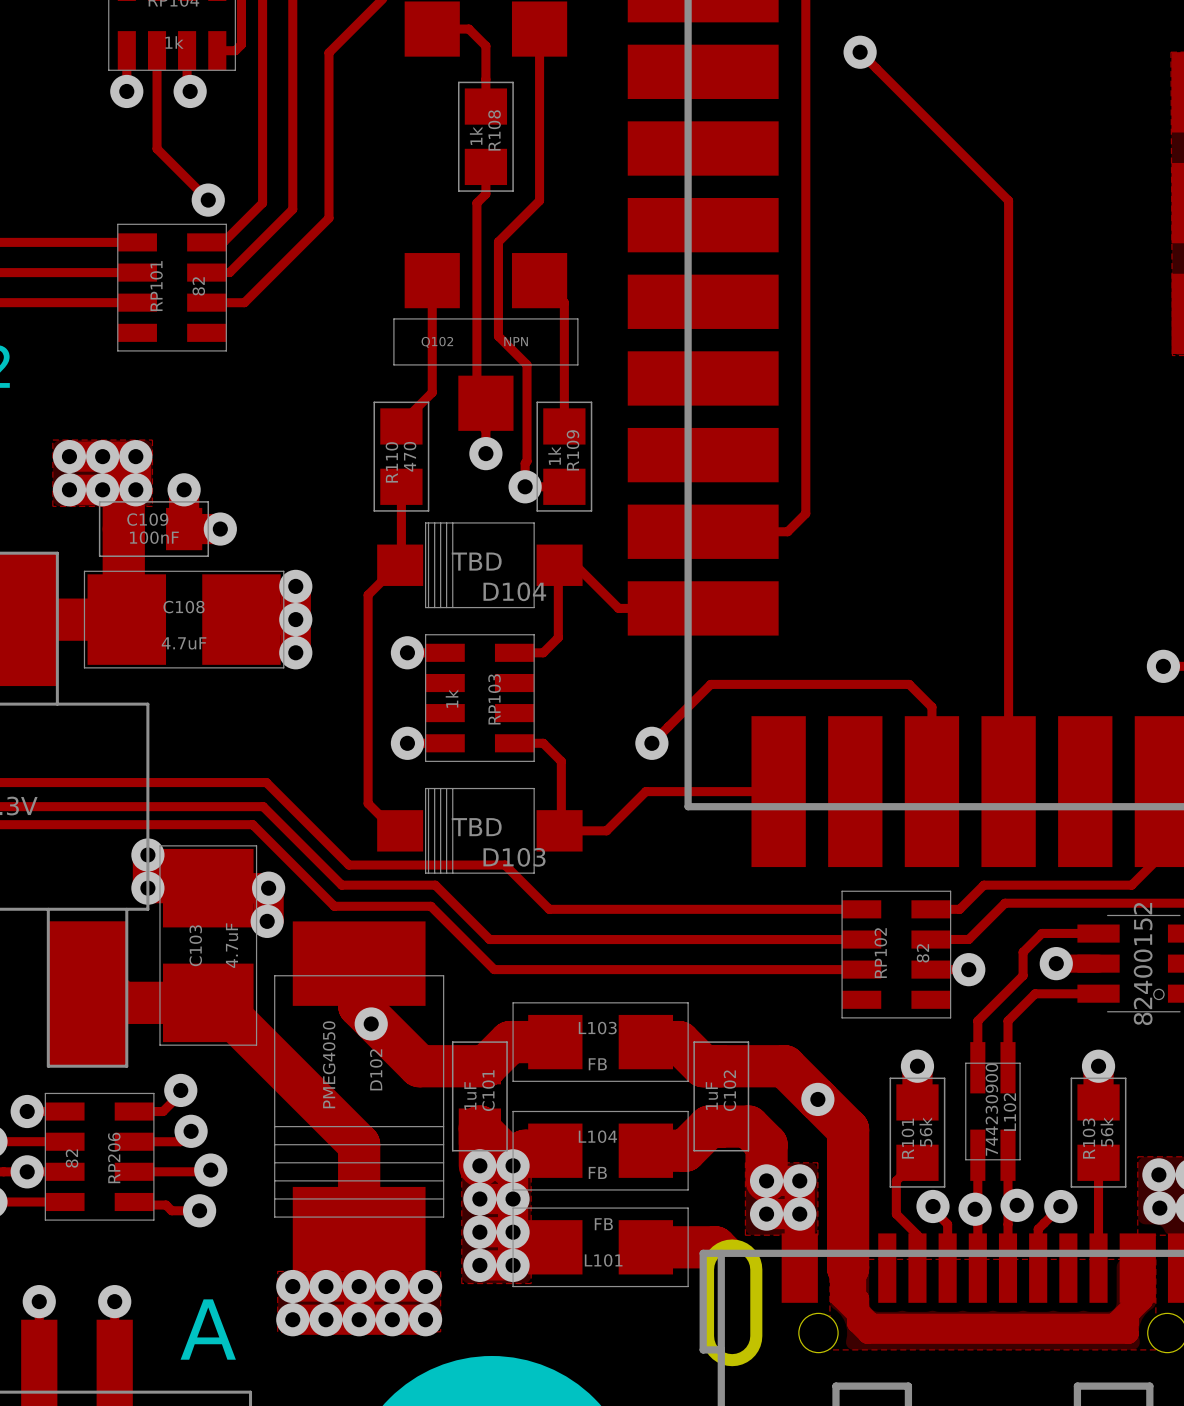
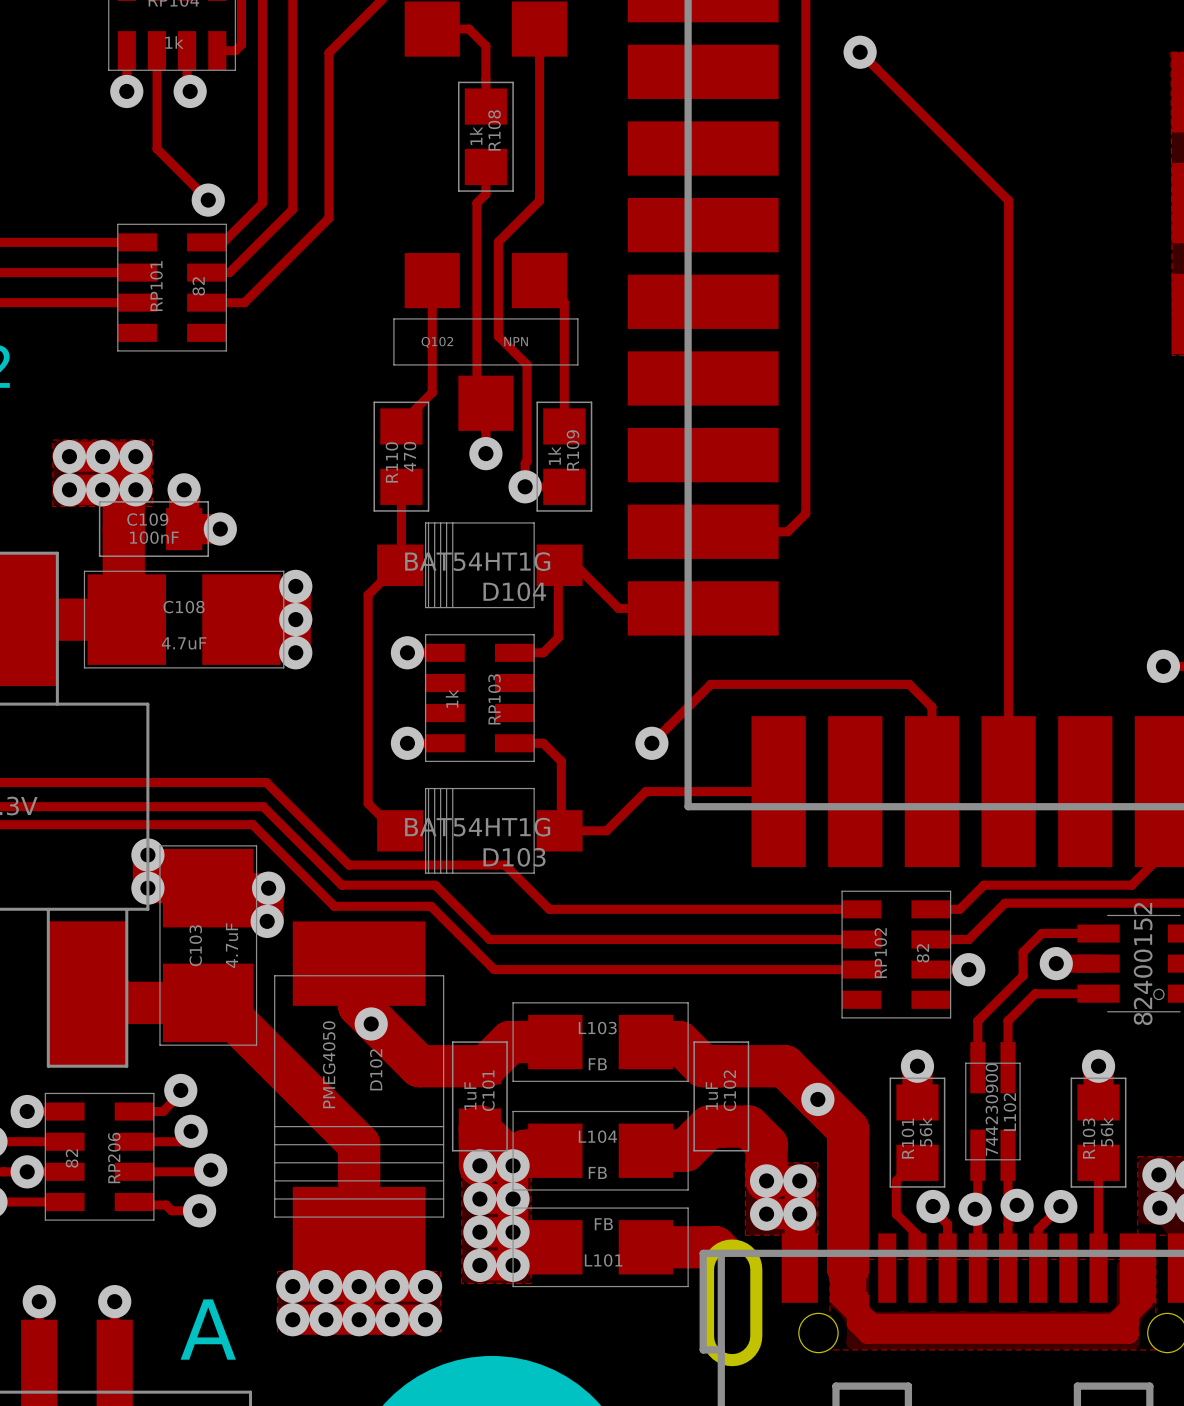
D104 value: TBD (476, 561) -> BAT54HT1G (477, 561)
D103 value: TBD (476, 827) -> BAT54HT1G (477, 827)

